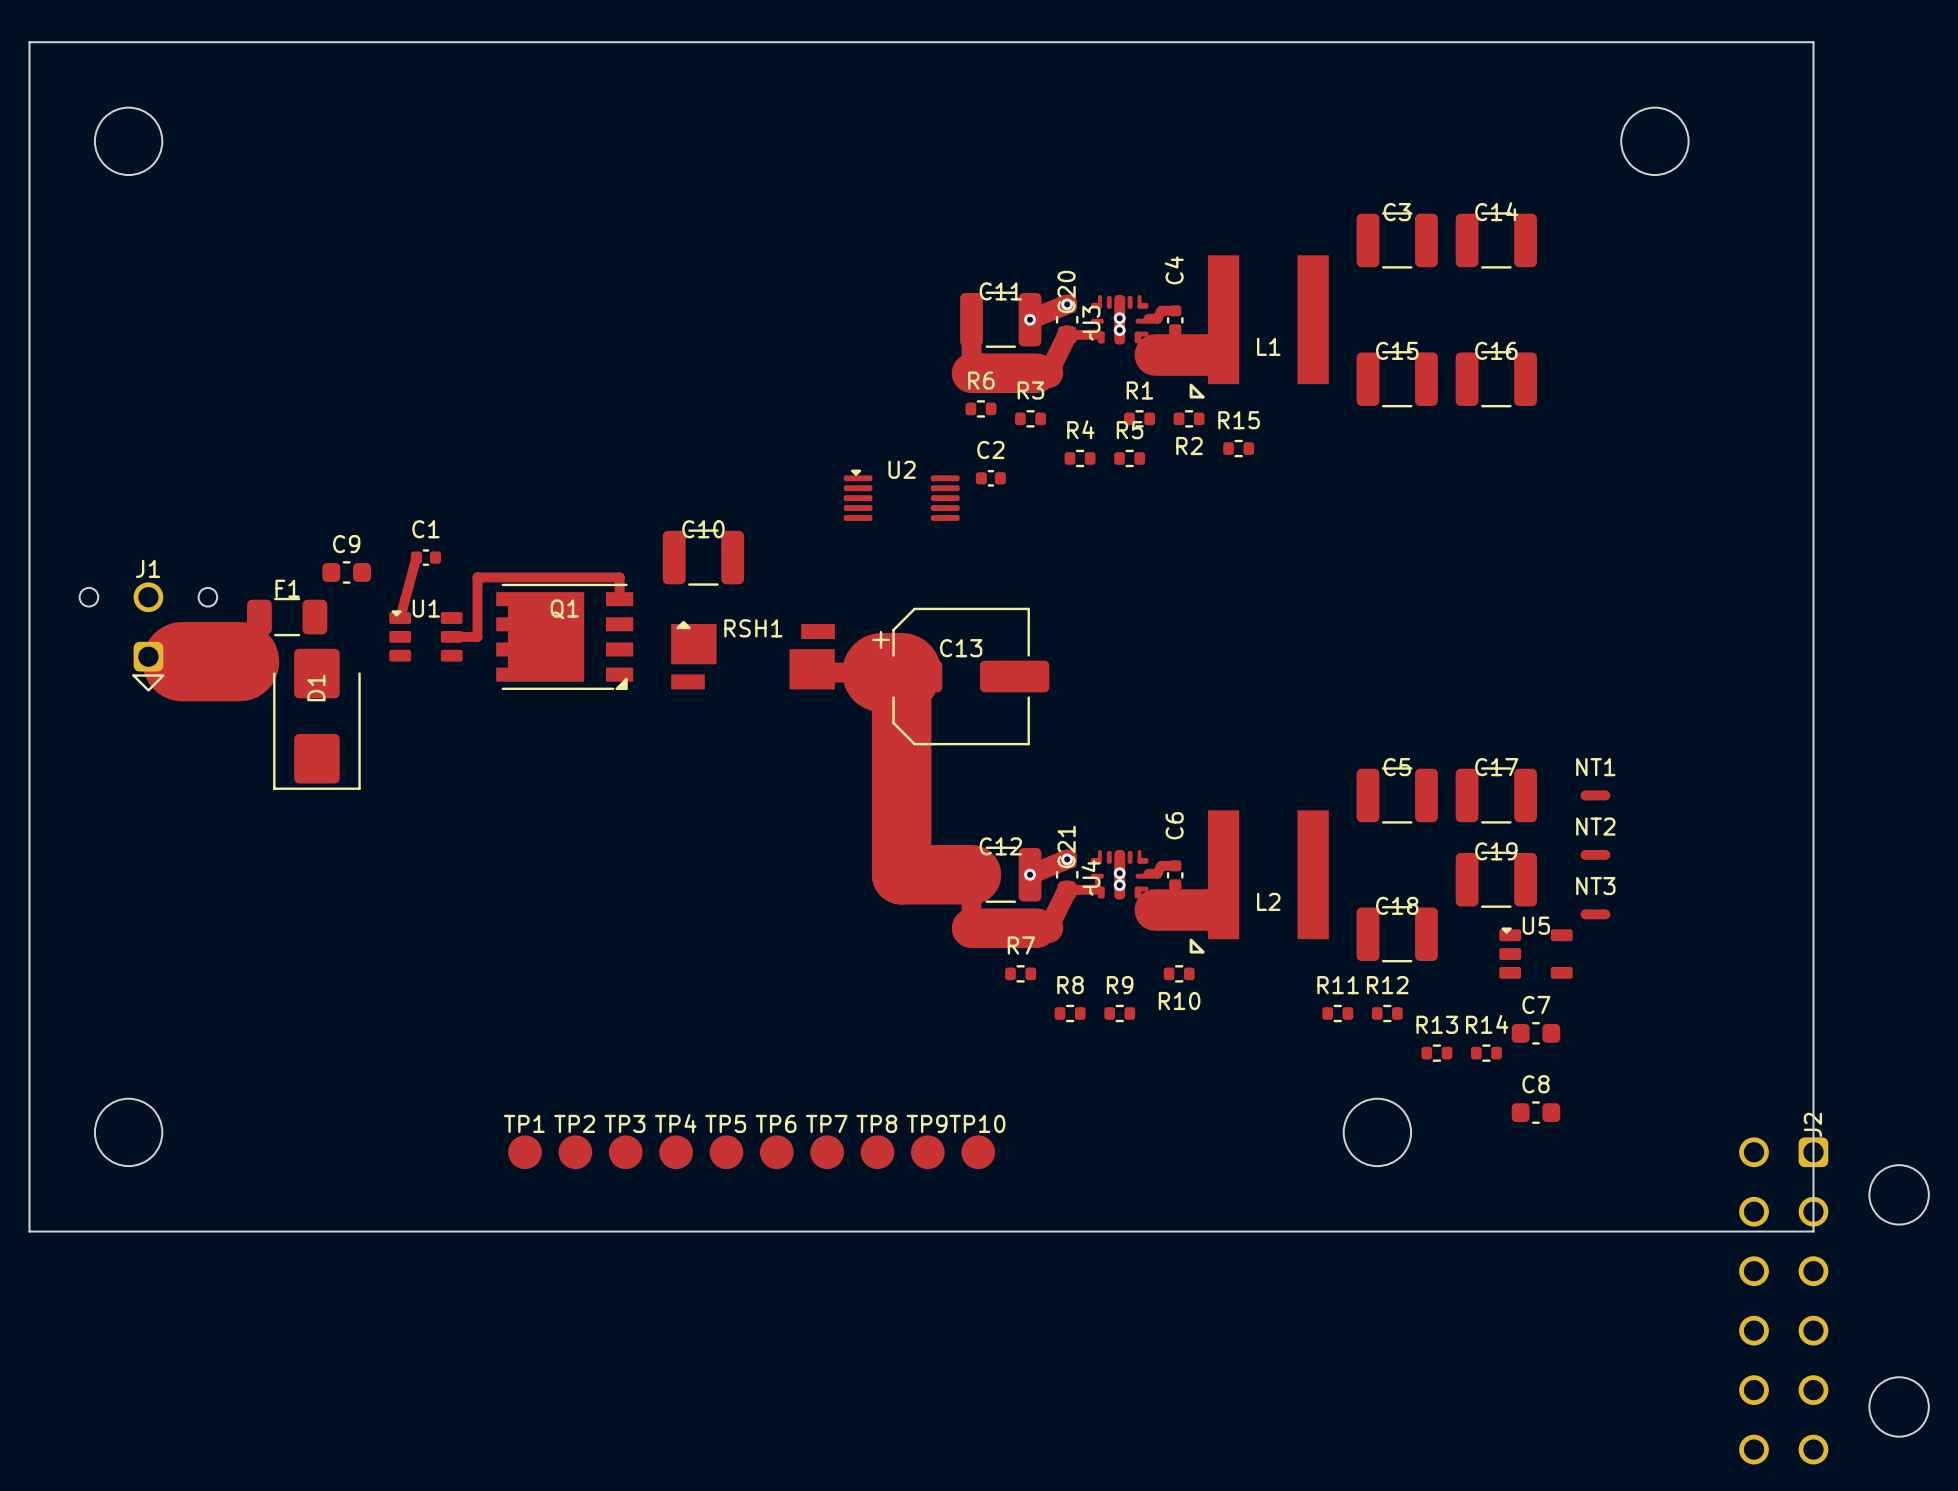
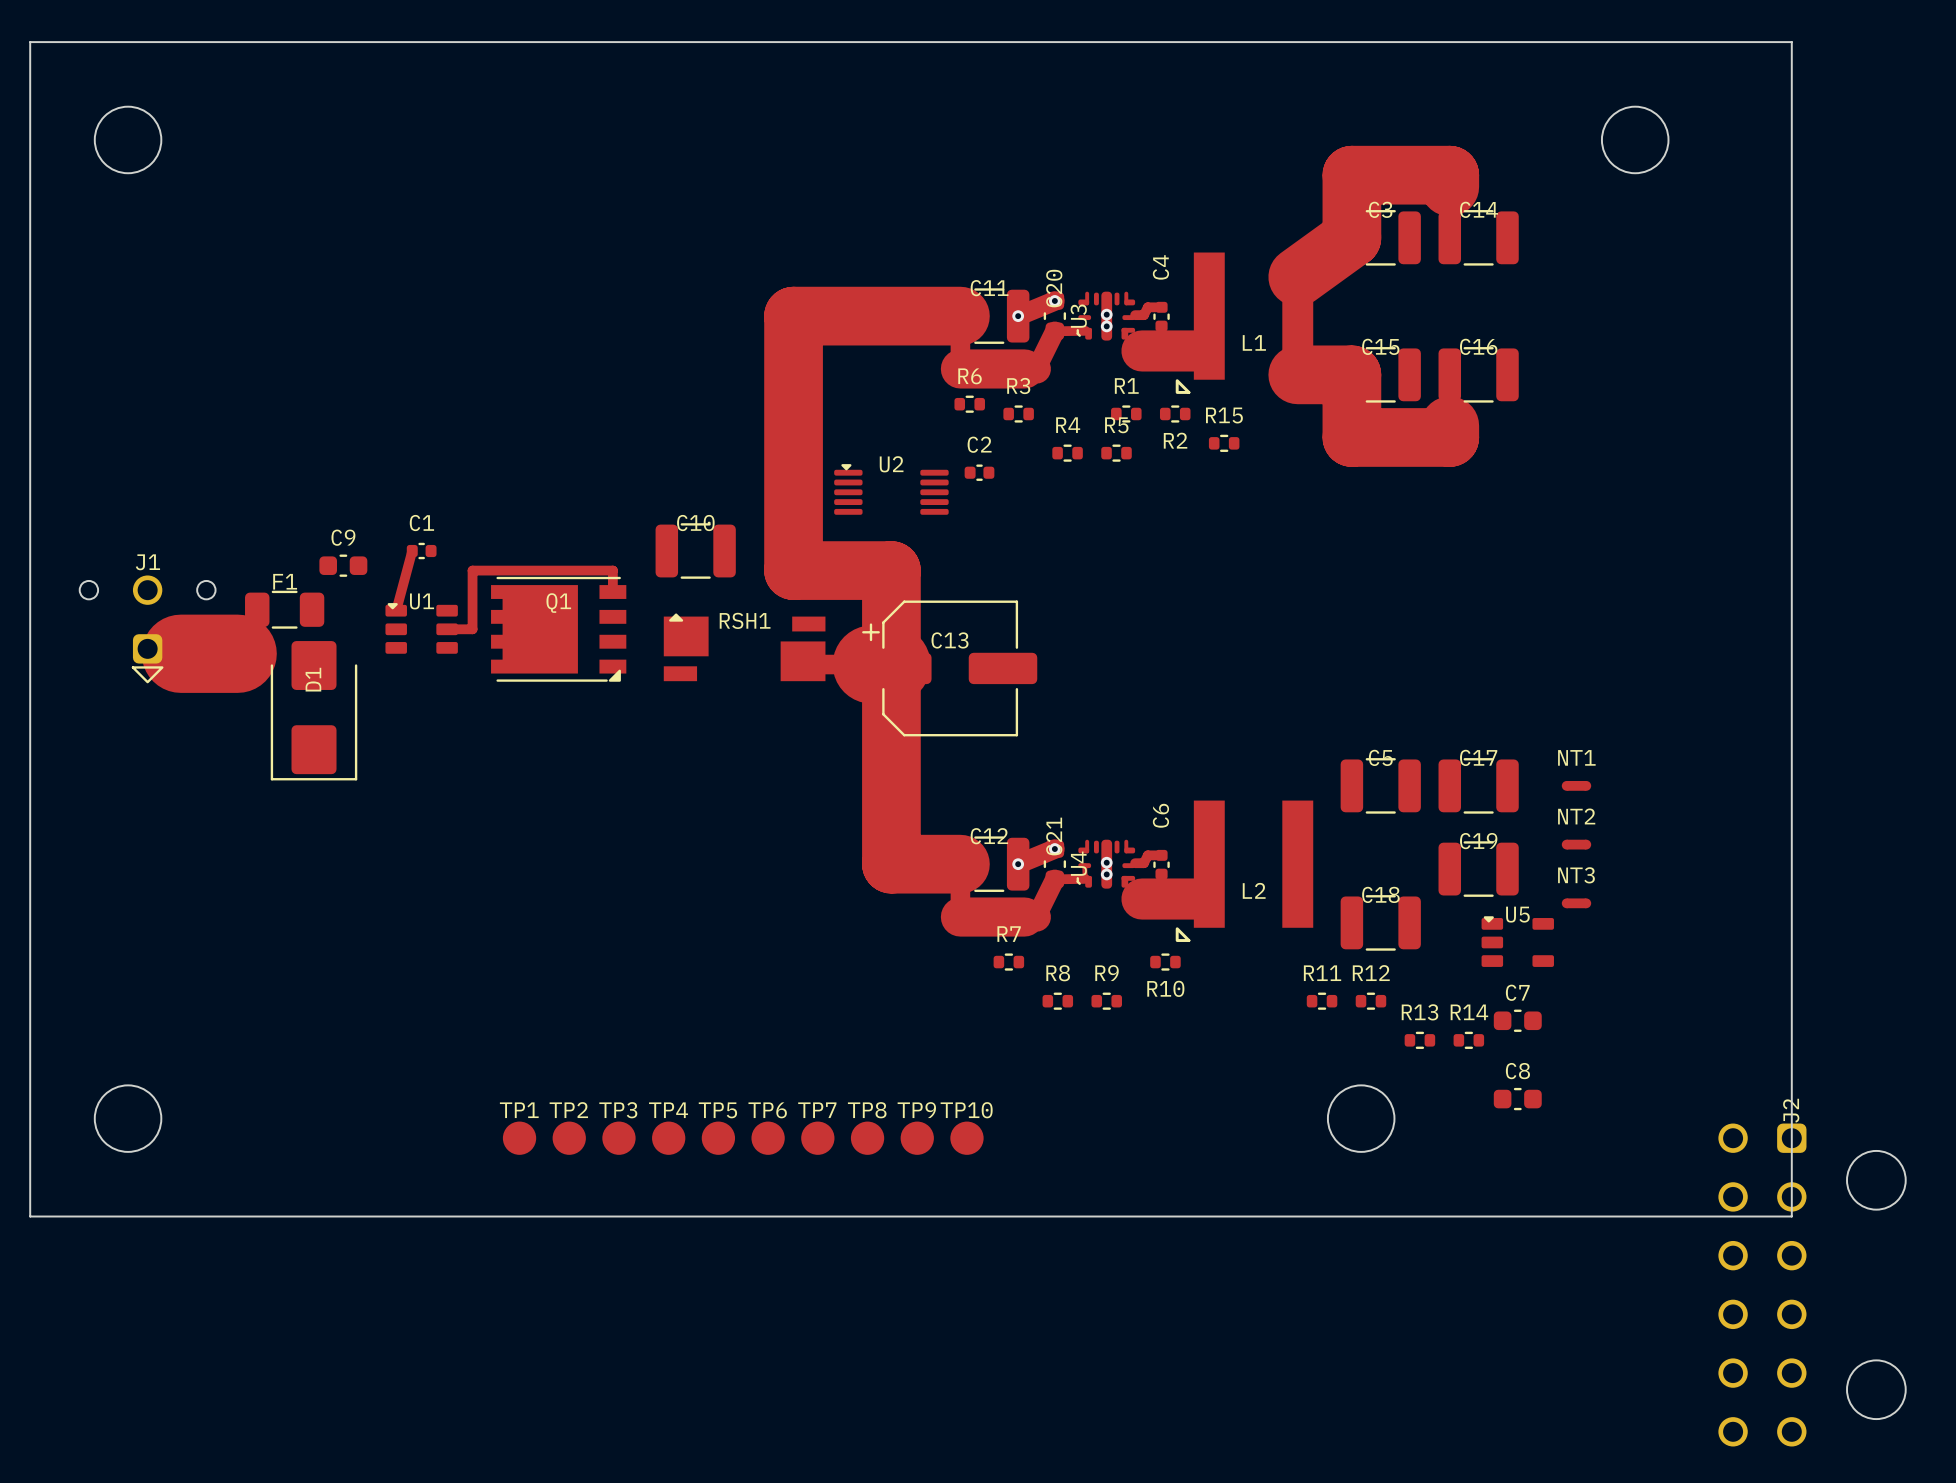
top track: none -> (1449, 237) (1449, 175) (1351, 175) (1351, 237) (1297, 276)
top track: none -> (960, 316) (793, 316) (793, 570) (891, 570) (891, 664)
top track: none -> (1297, 374) (1351, 374) (1351, 437) (1449, 437) (1449, 374)

